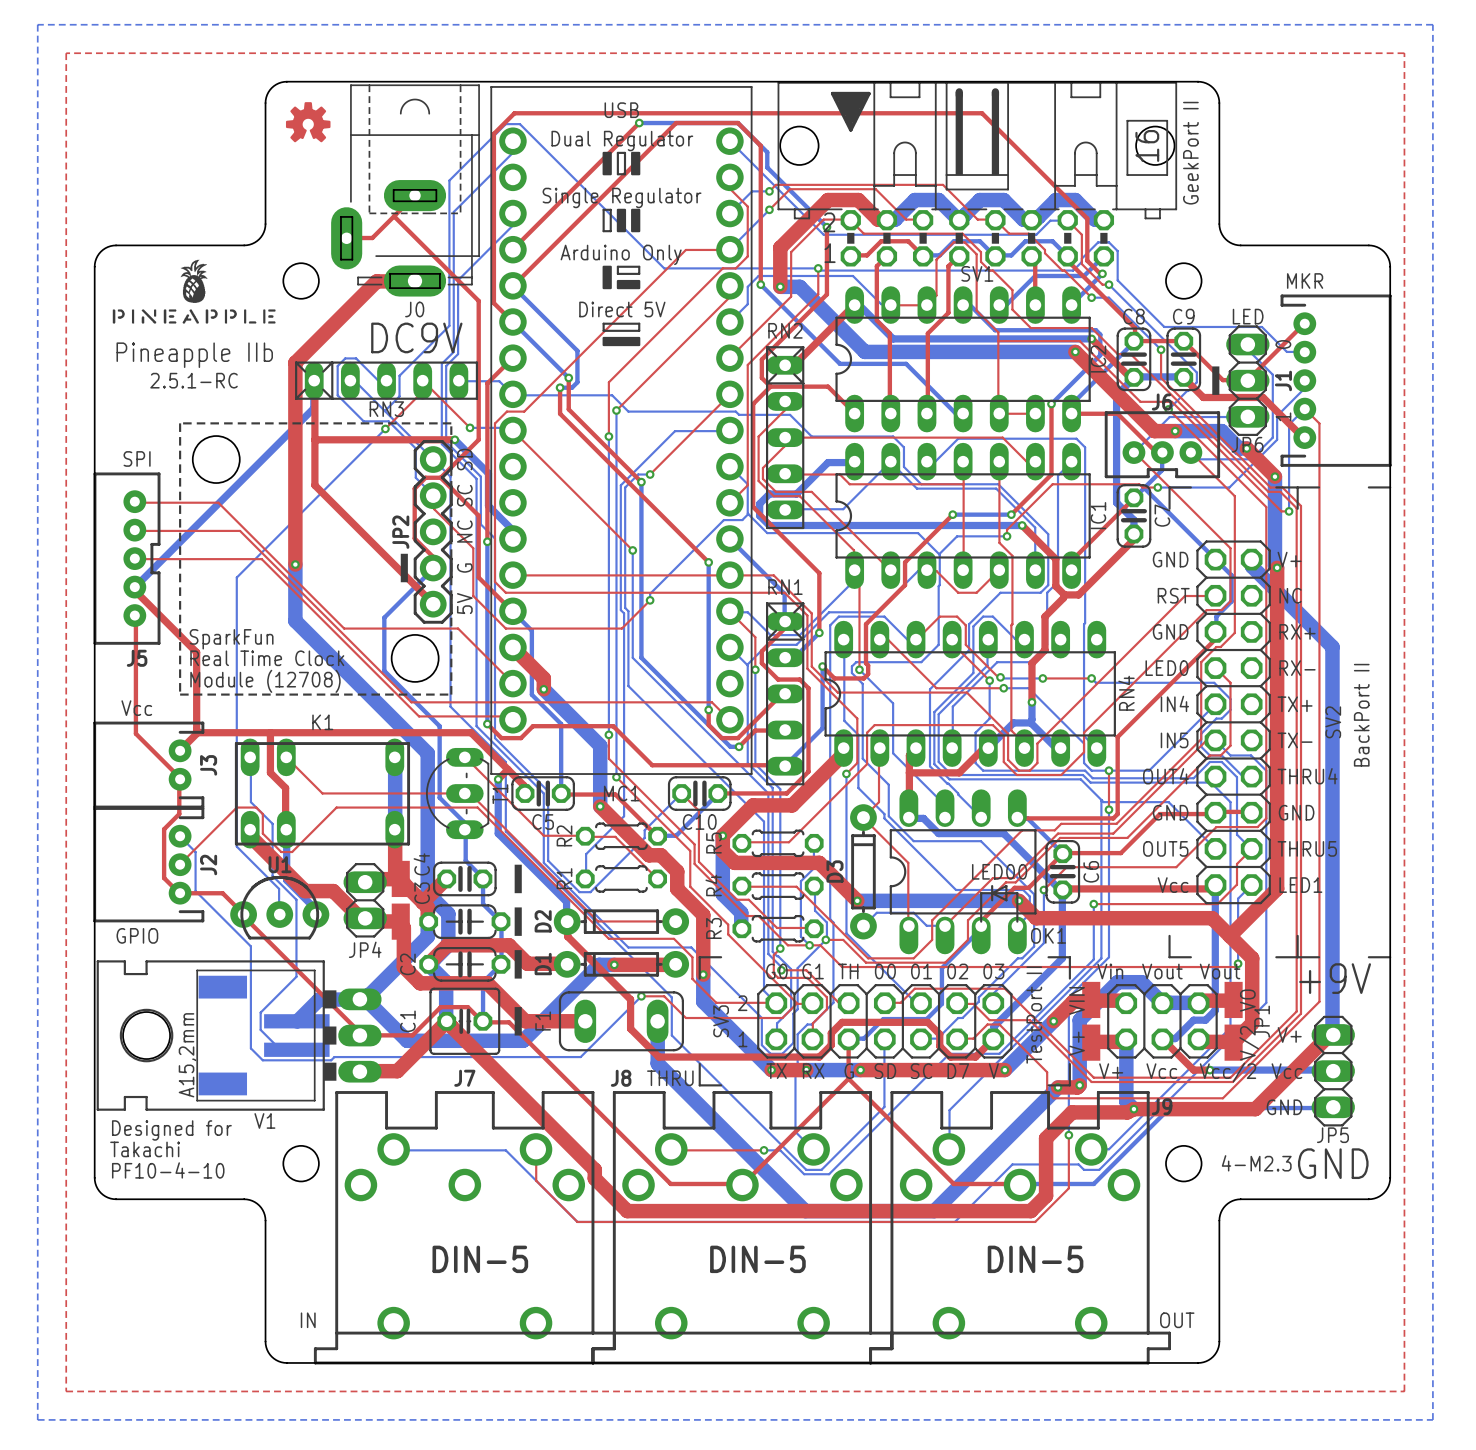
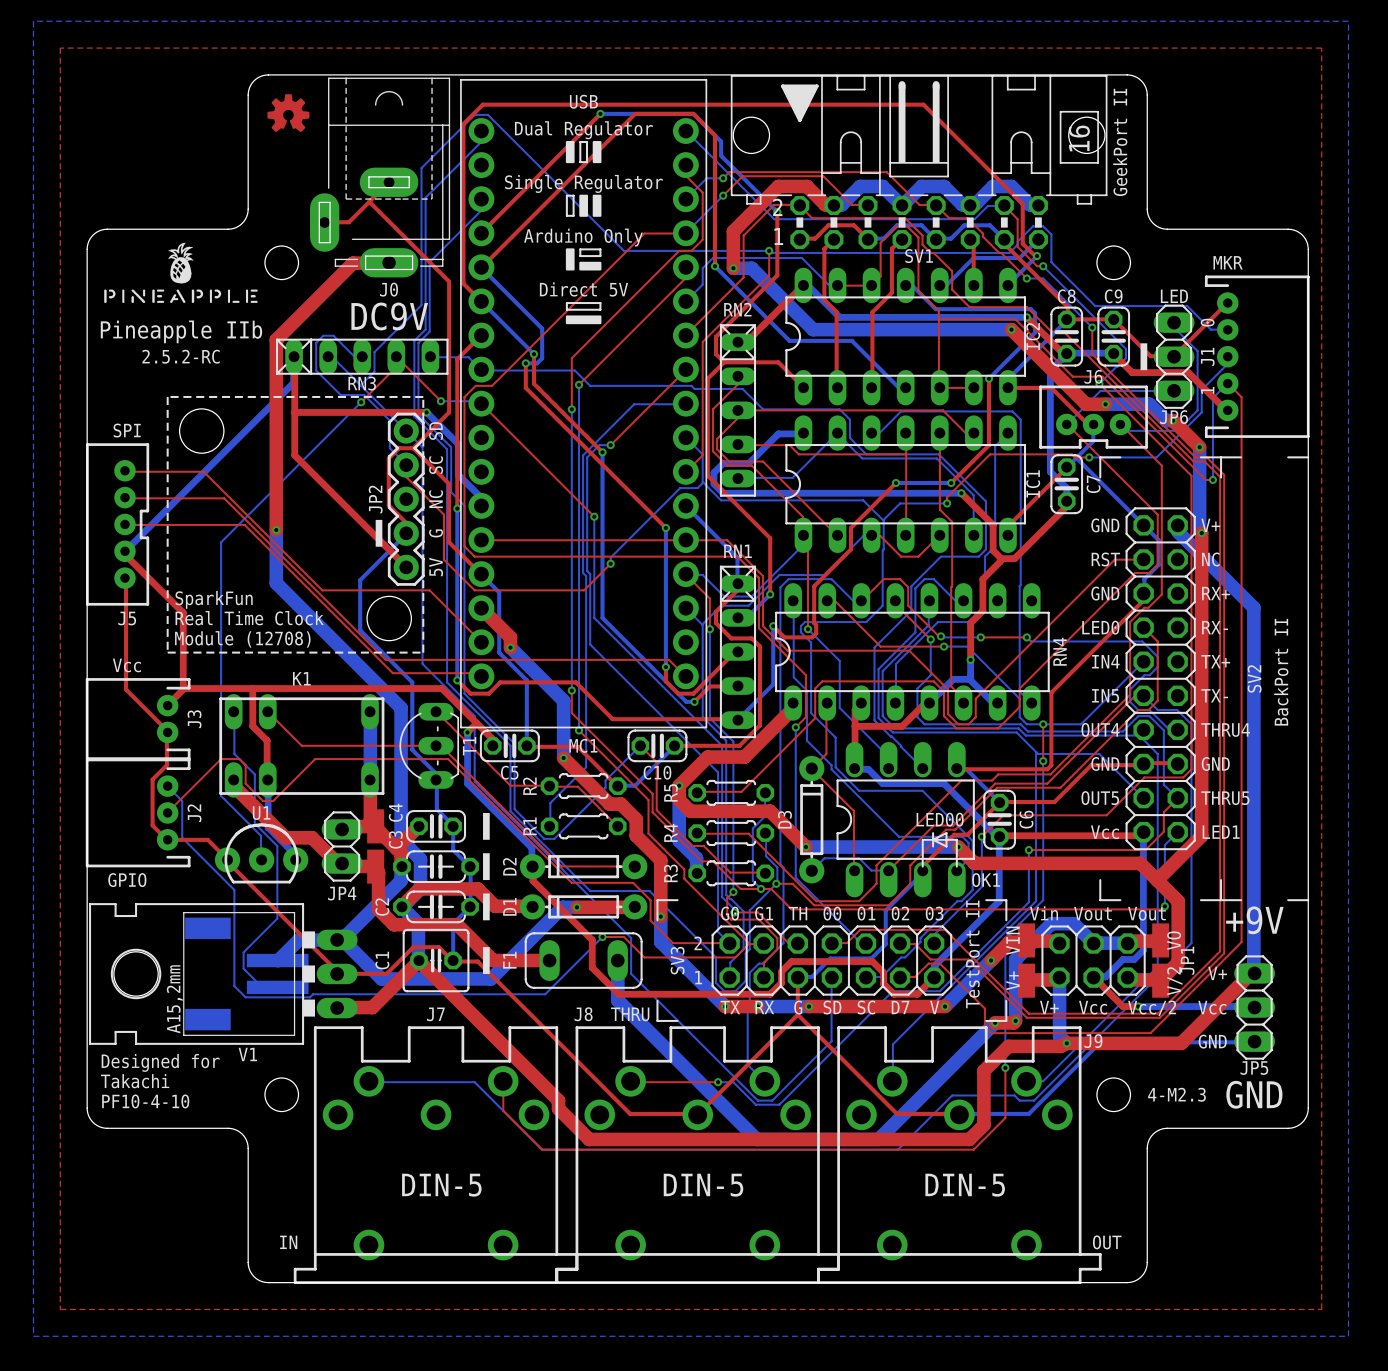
text: 2.5.1-RC (194, 380) -> 2.5.2-RC (181, 356)

